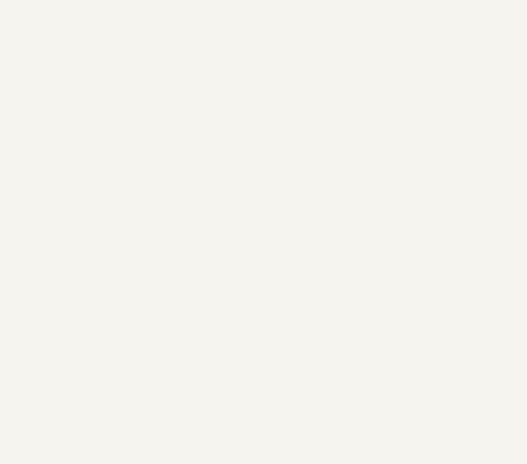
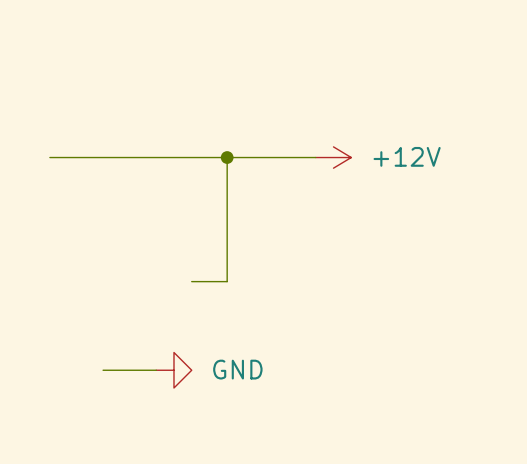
wire: none -> (49, 157) (315, 157)
wire: none -> (227, 157) (227, 281) (191, 281)
junction: none -> (227, 157)
power symbol: none -> +12V (333, 157)
wire: none -> (103, 370) (156, 370)
power symbol: none -> GND (173, 370)

